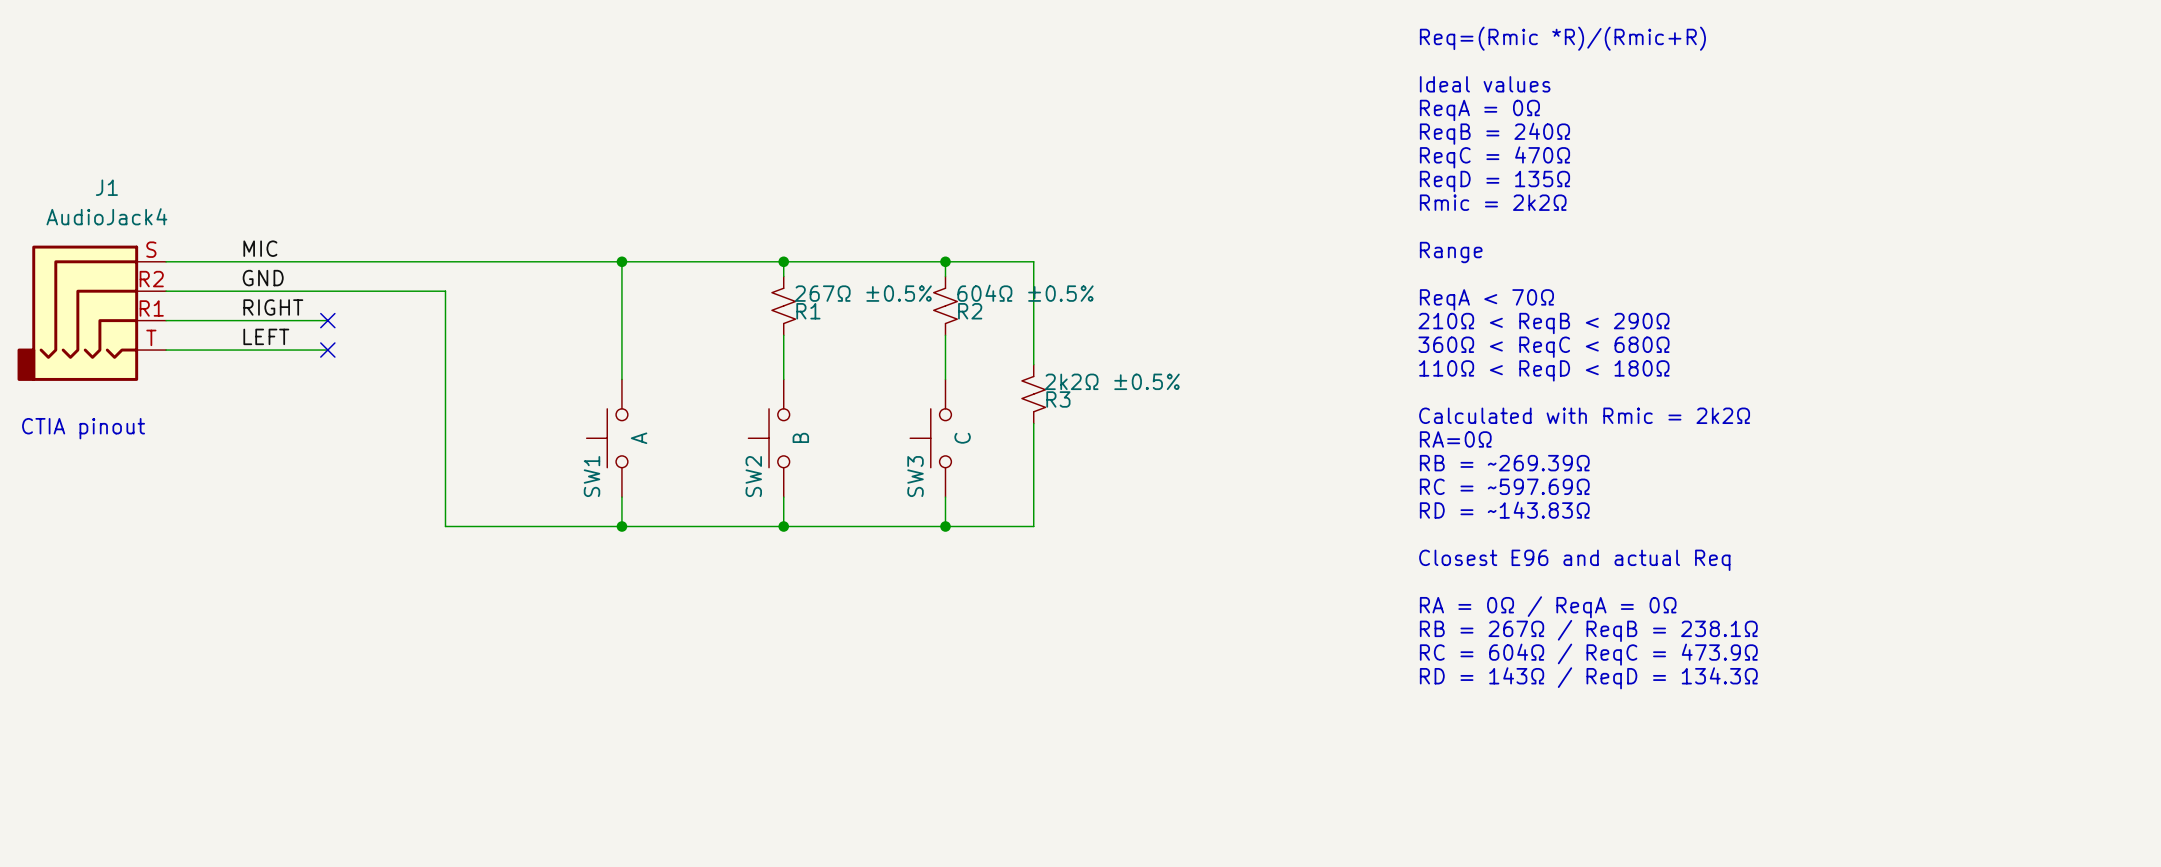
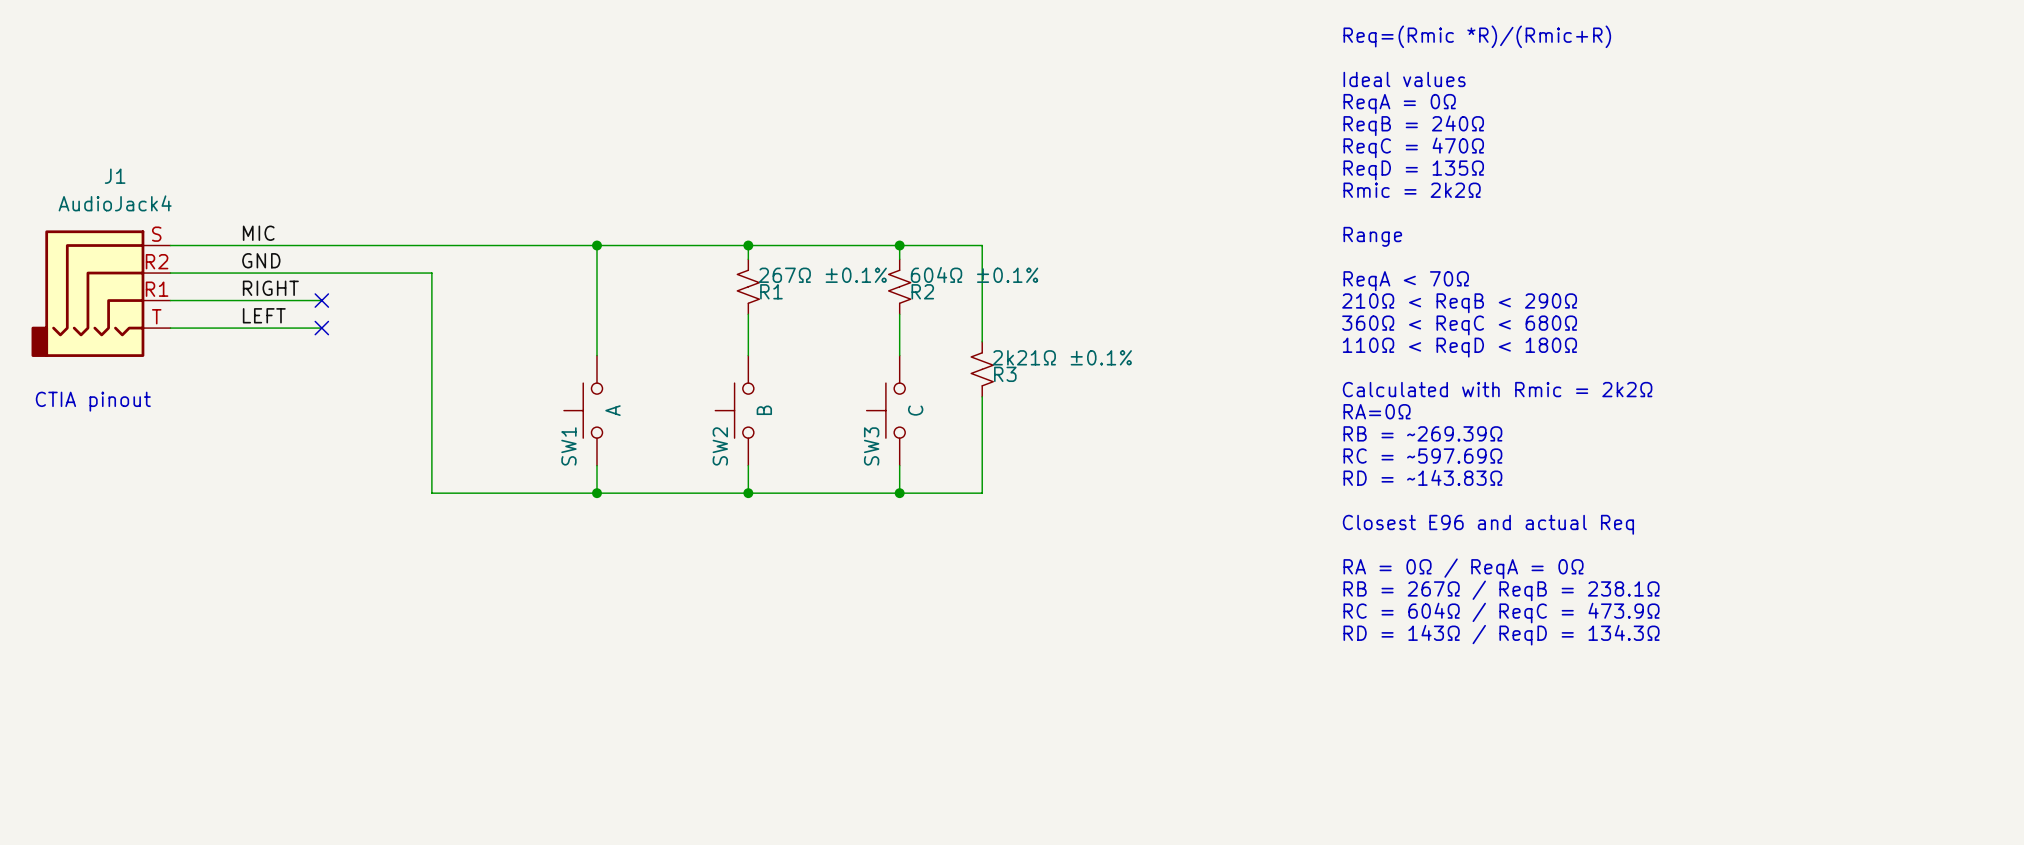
R1 value: 267Ω ±0.5% (863, 293) -> 267Ω ±0.1% (822, 275)
R2 value: 604Ω ±0.5% (1025, 293) -> 604Ω ±0.1% (974, 274)
R3 value: 2k2Ω ±0.5% (1112, 381) -> 2k21Ω ±0.1% (1062, 357)

